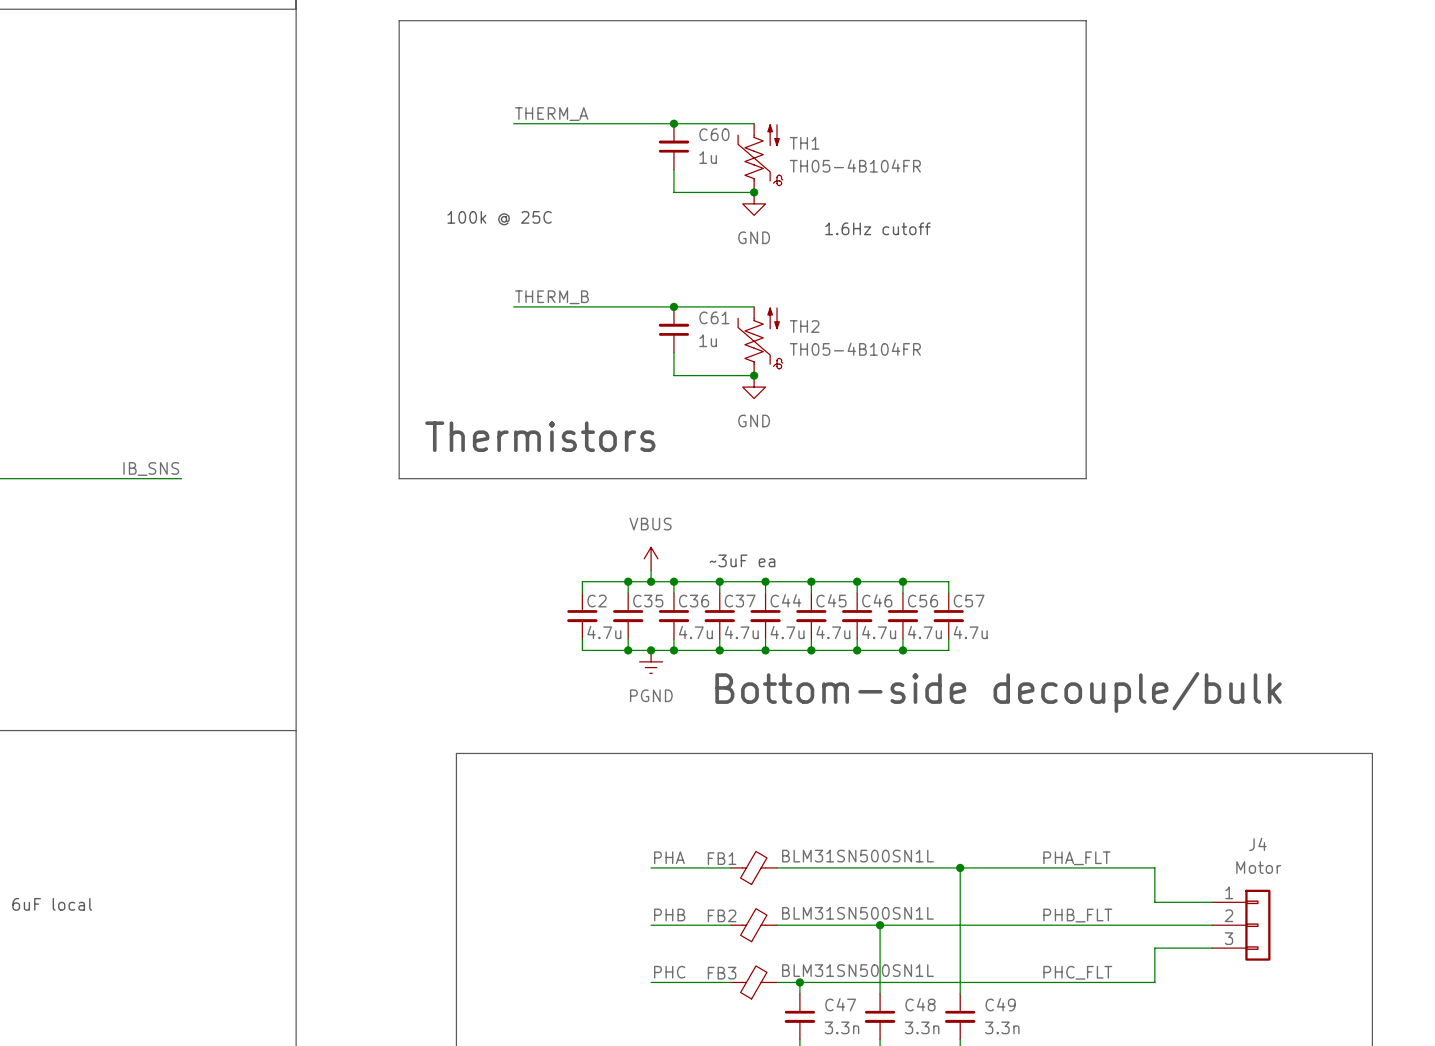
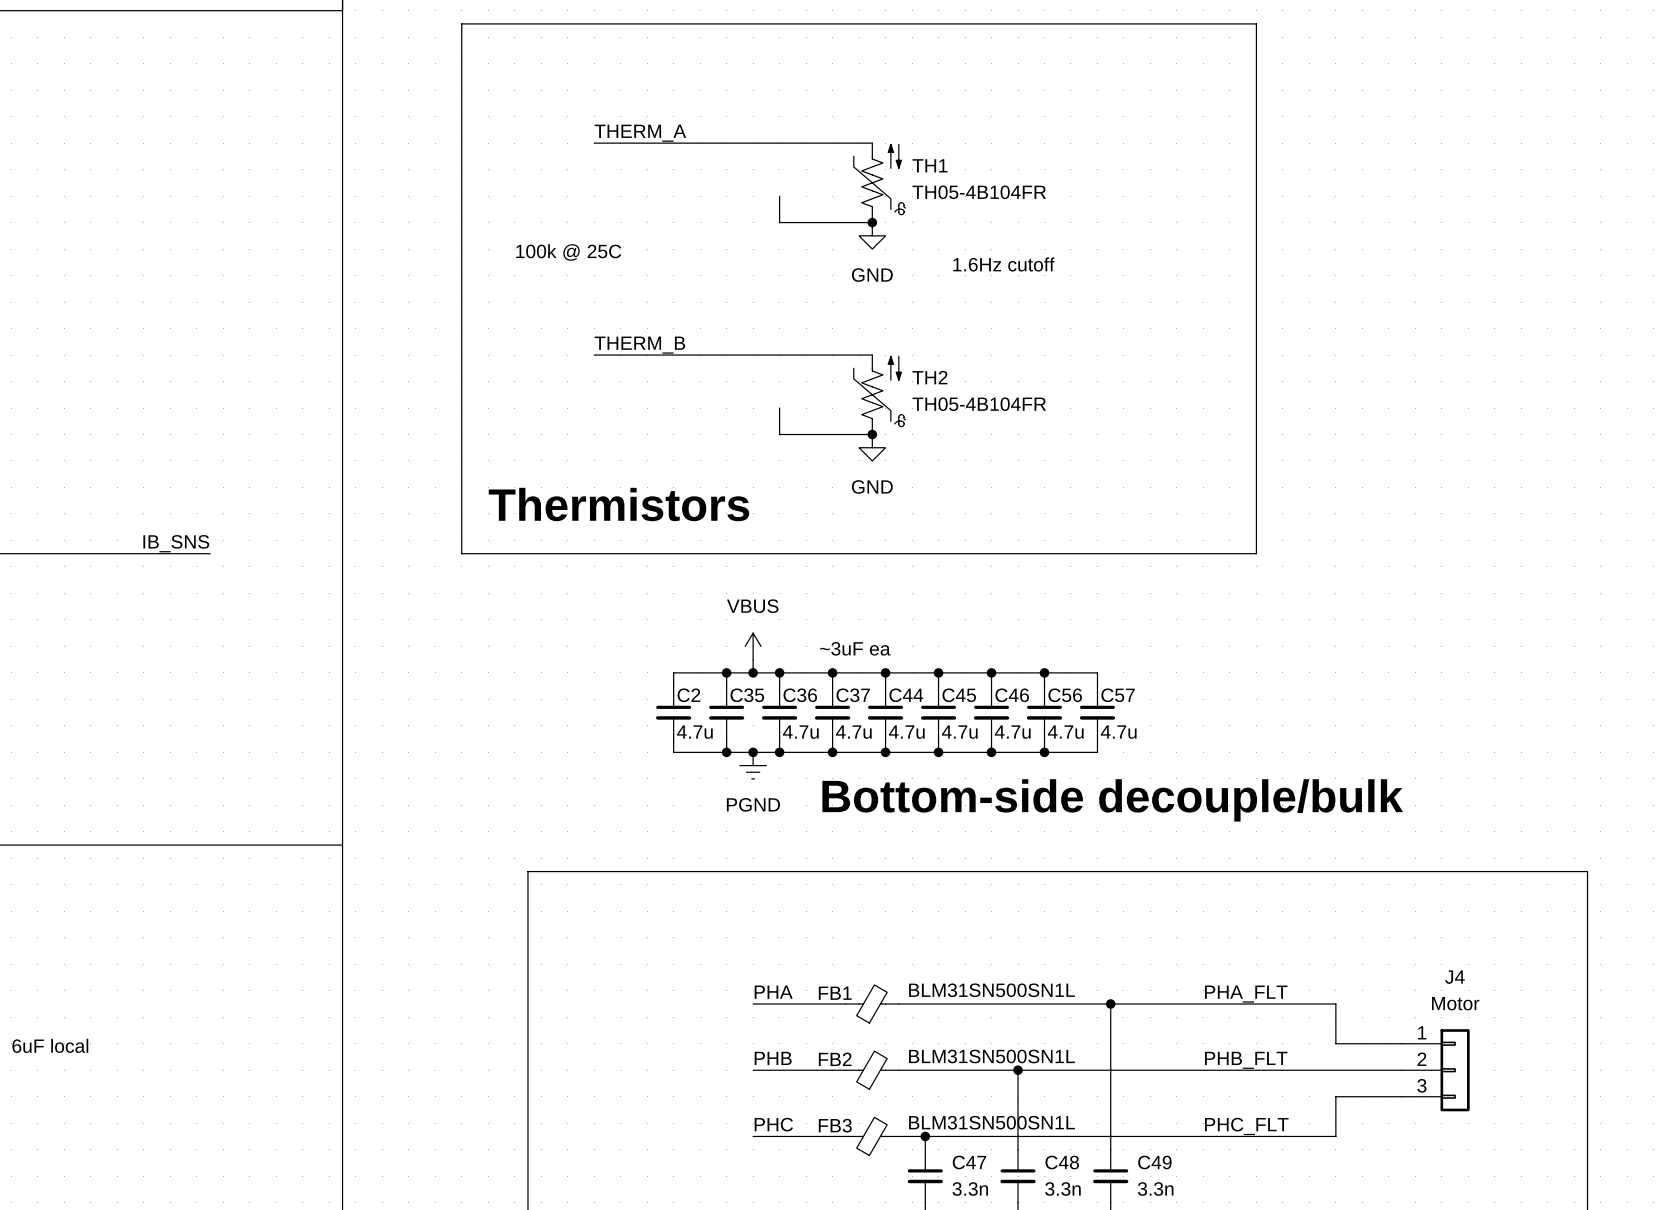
junction: (673, 123) -> none
C60: 1u (673, 146) -> none
junction: (673, 306) -> none
C61: 1u (673, 329) -> none

